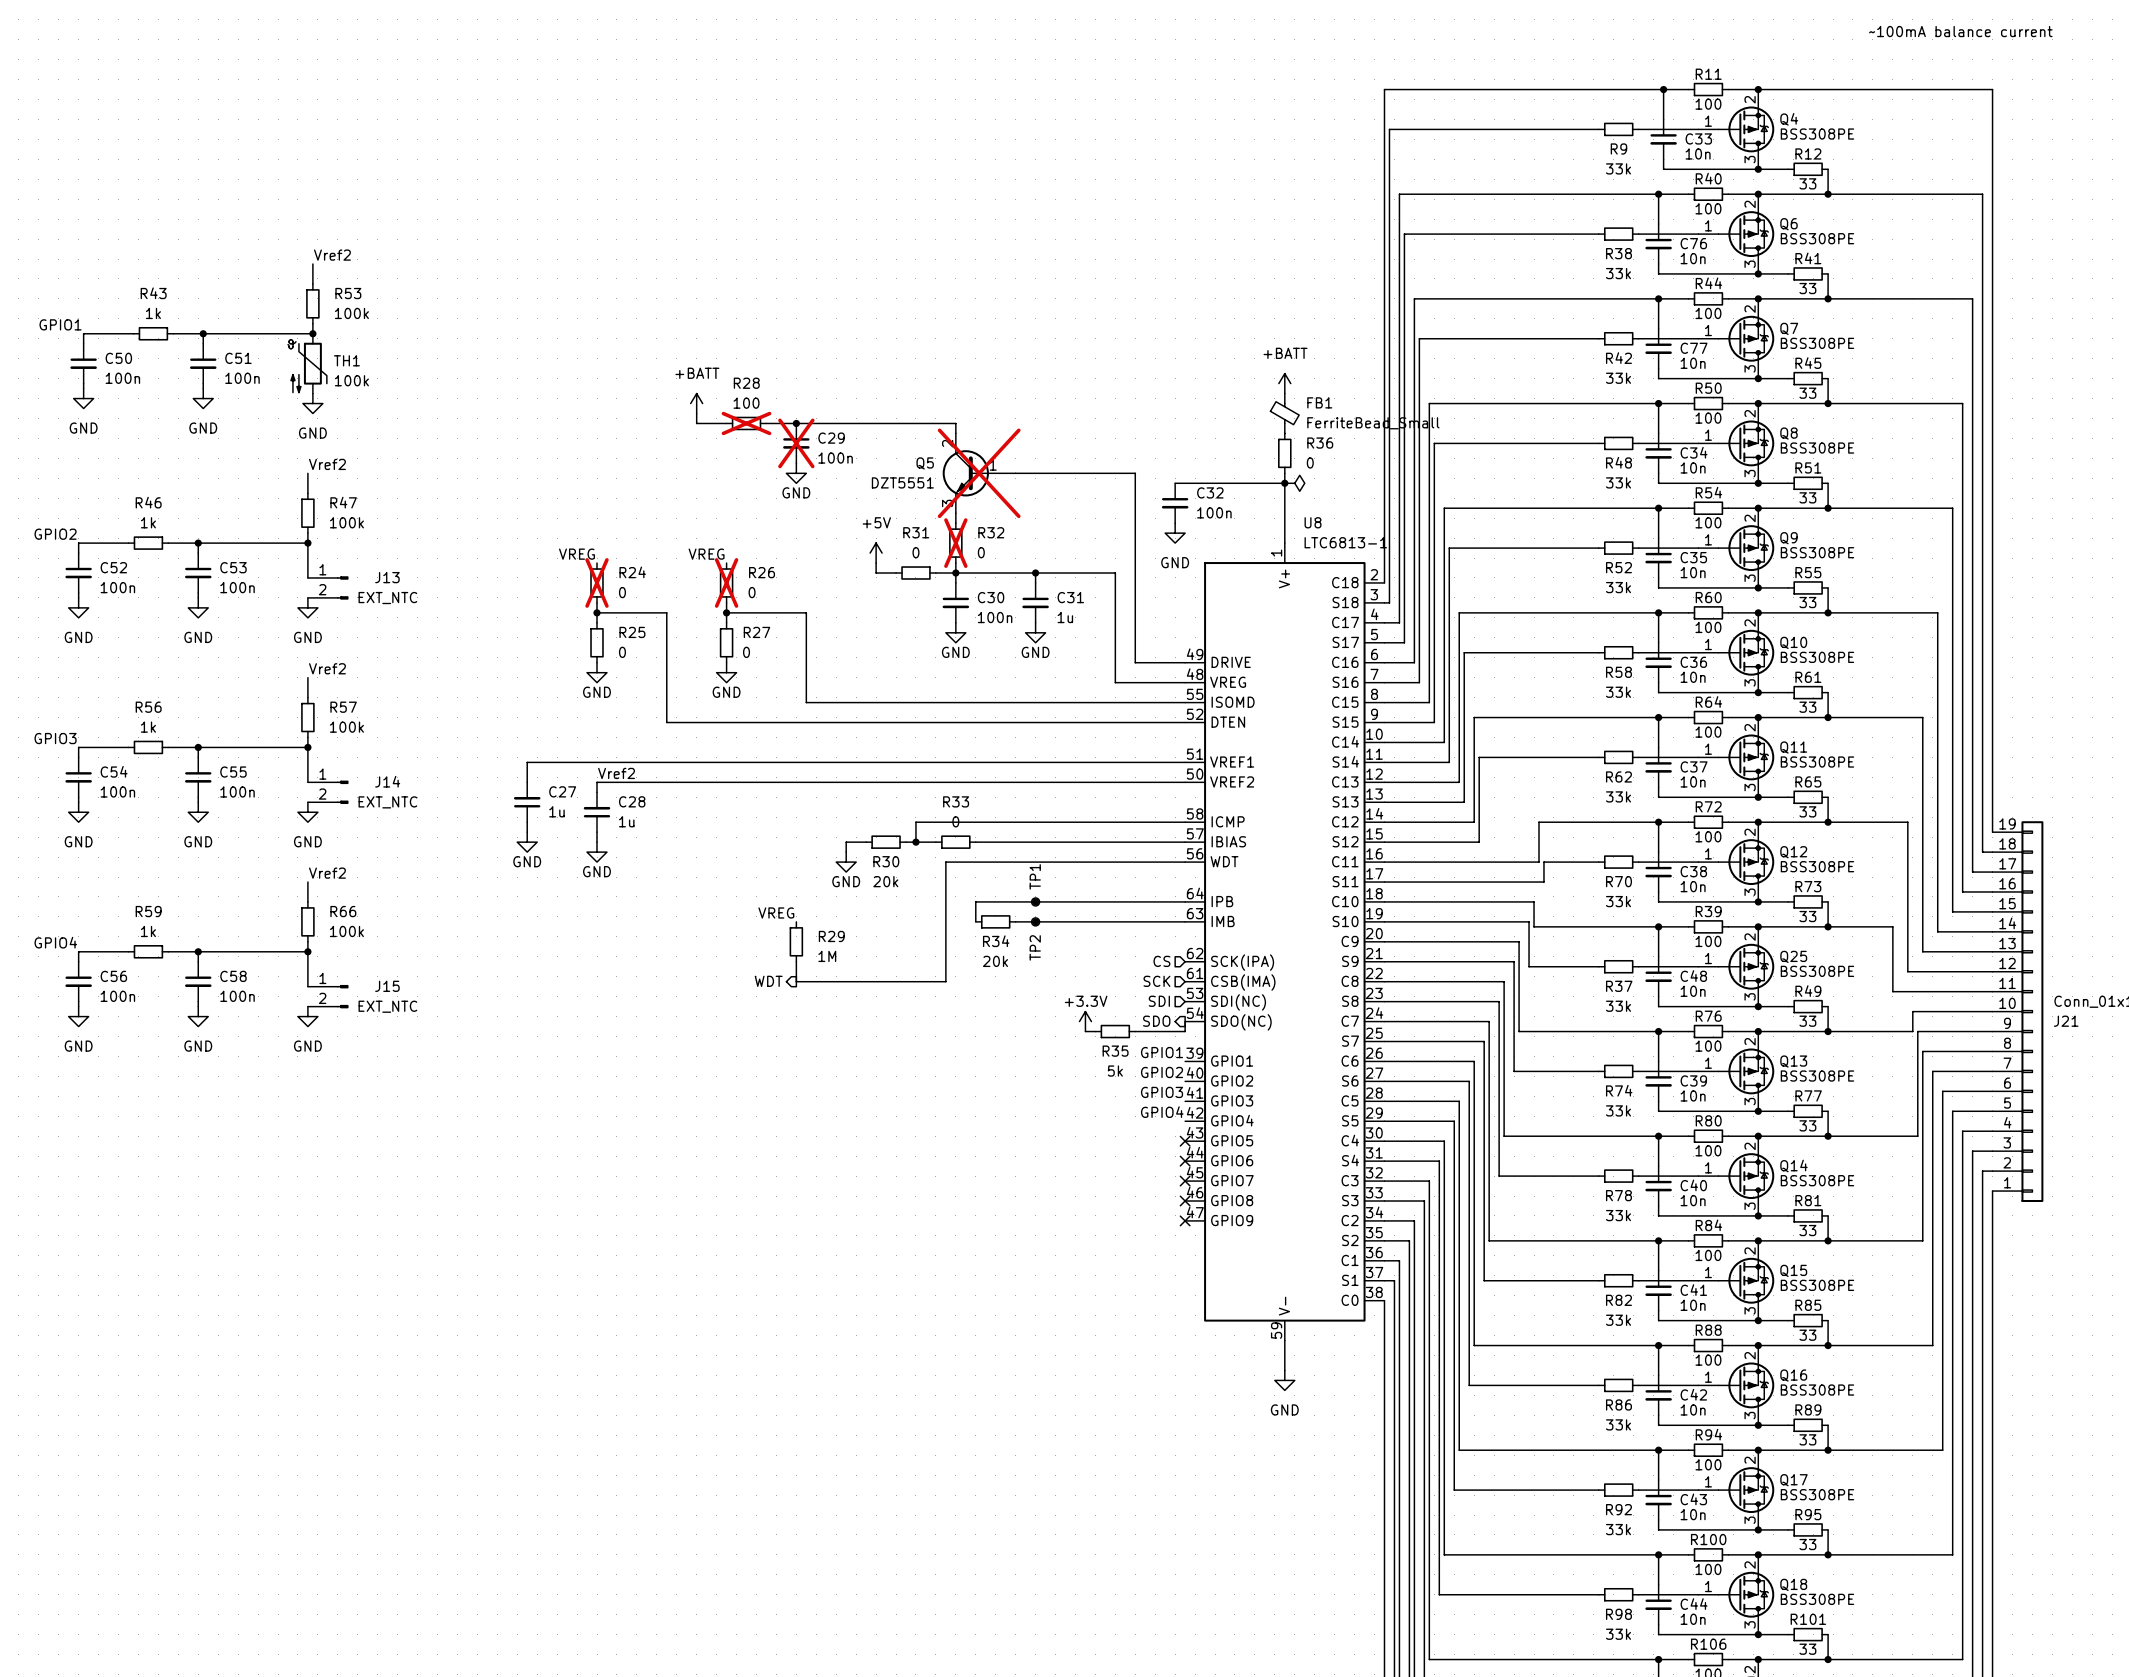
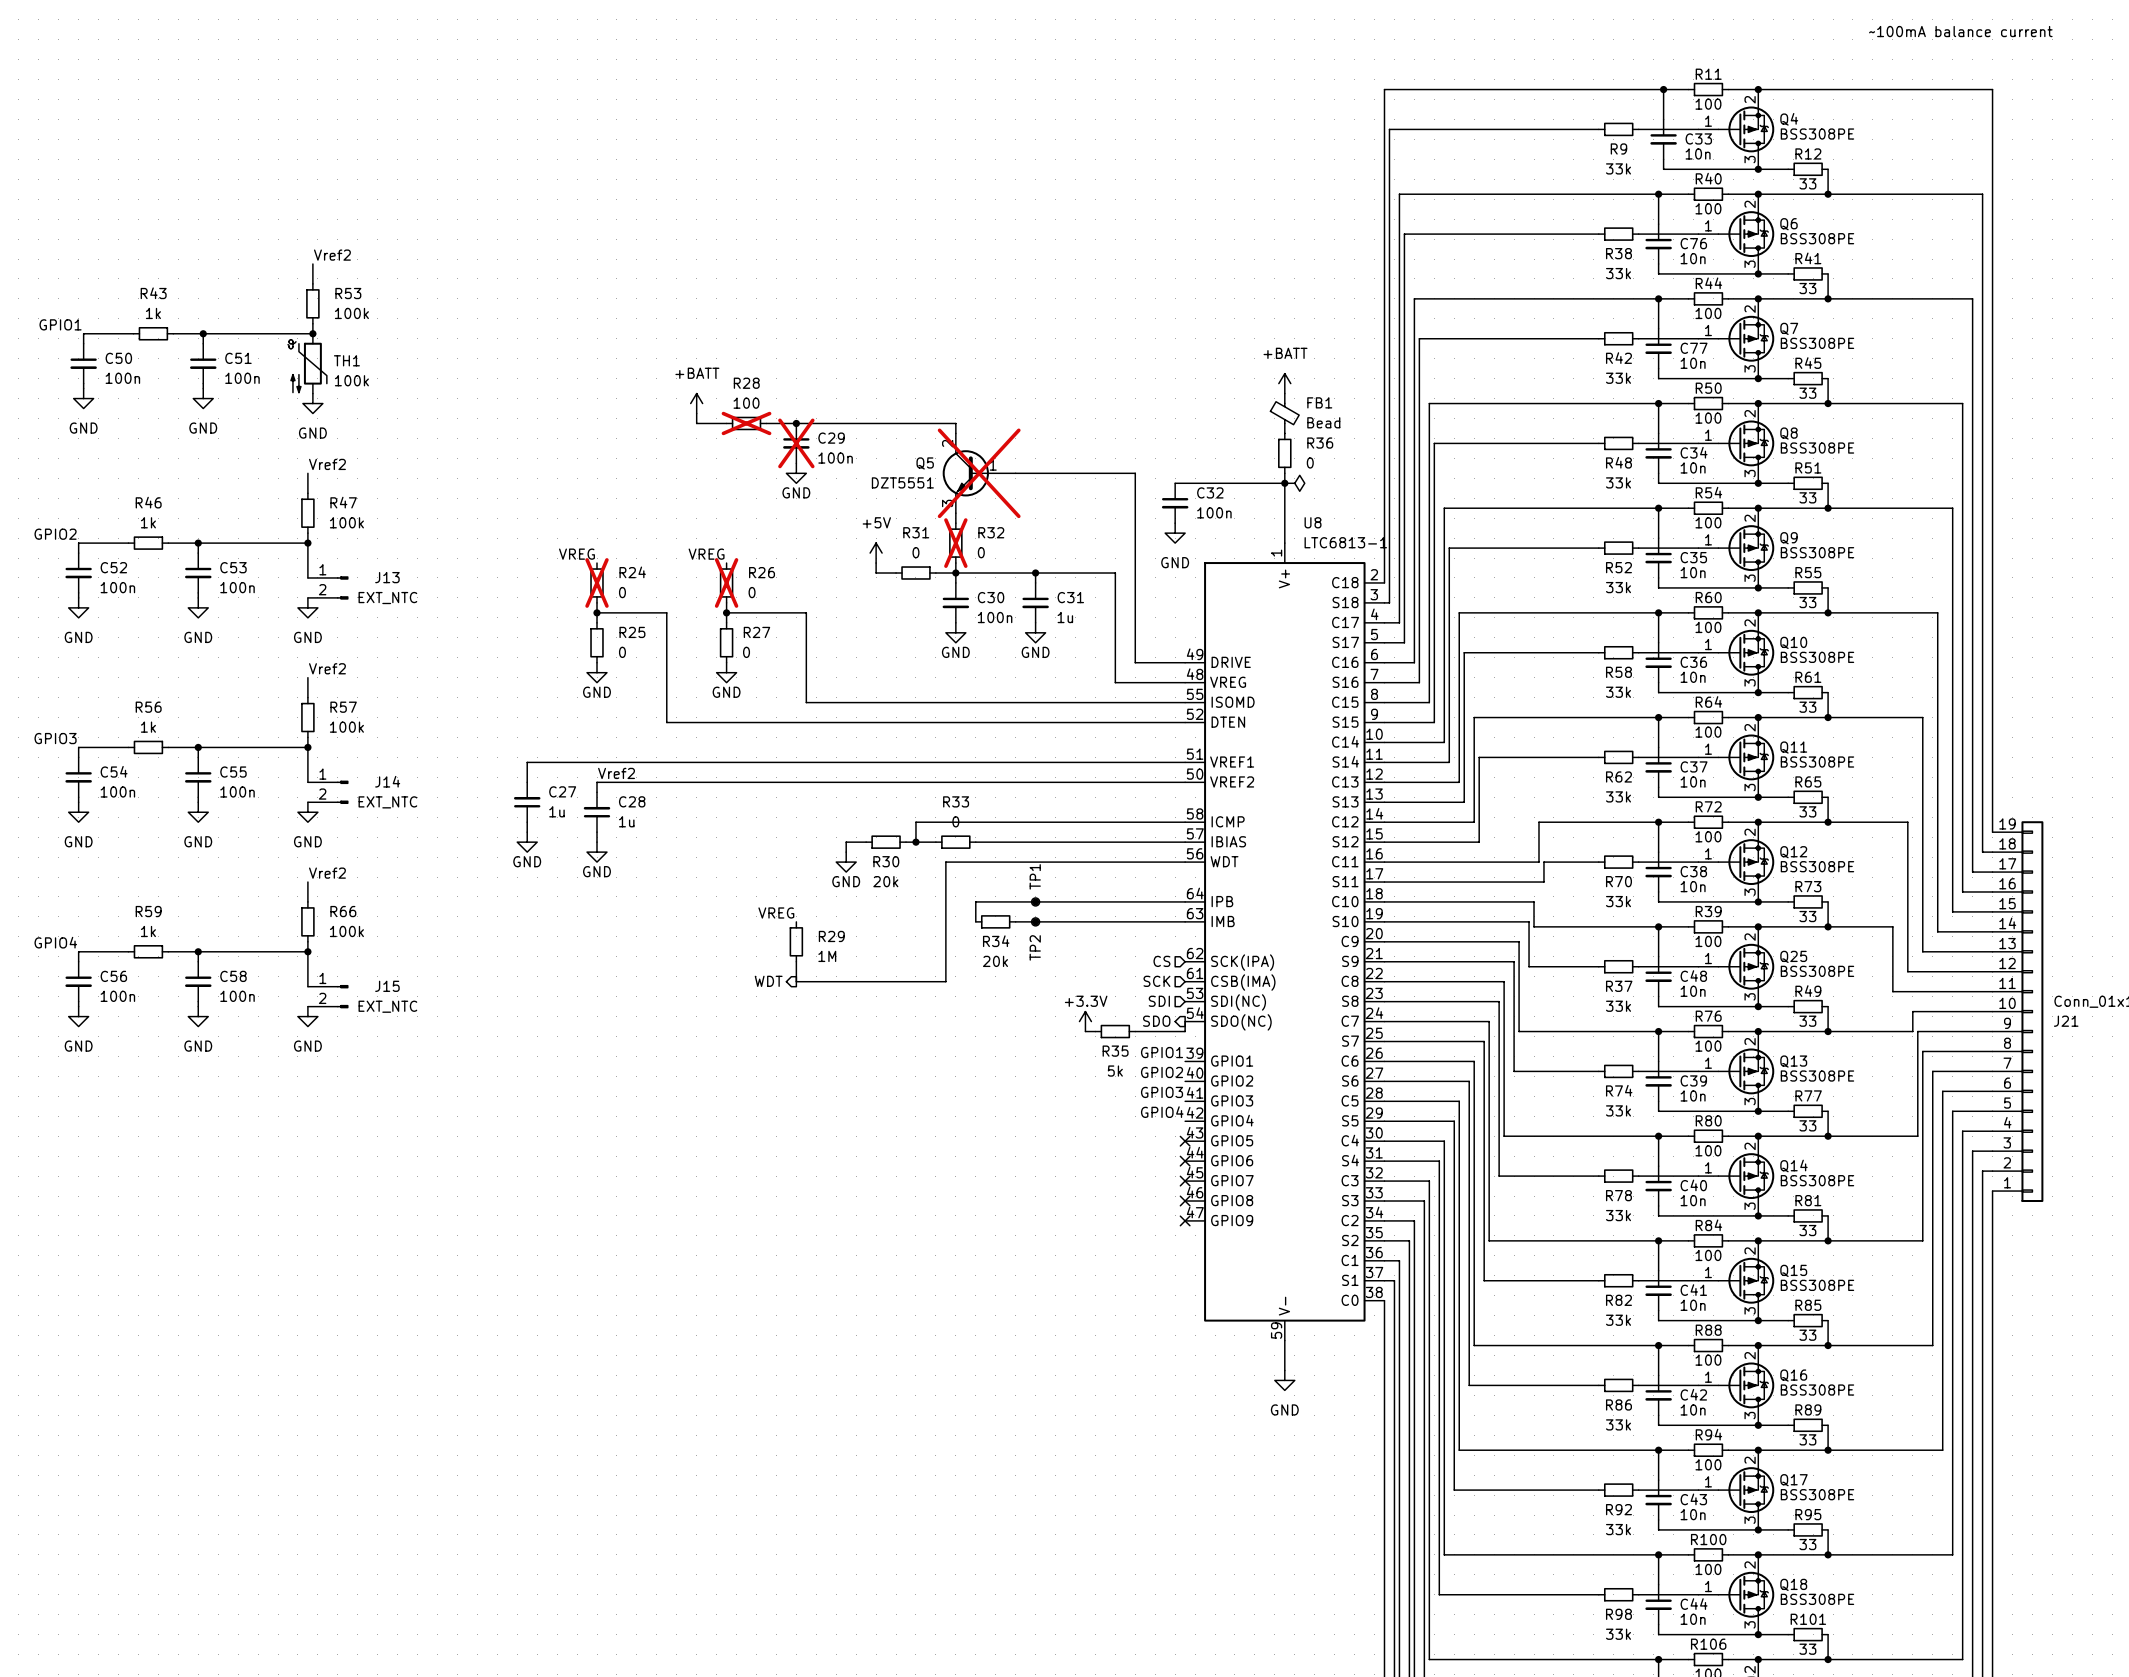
FB1 value: FerriteBead_Small (1373, 423) -> Bead (1323, 422)

